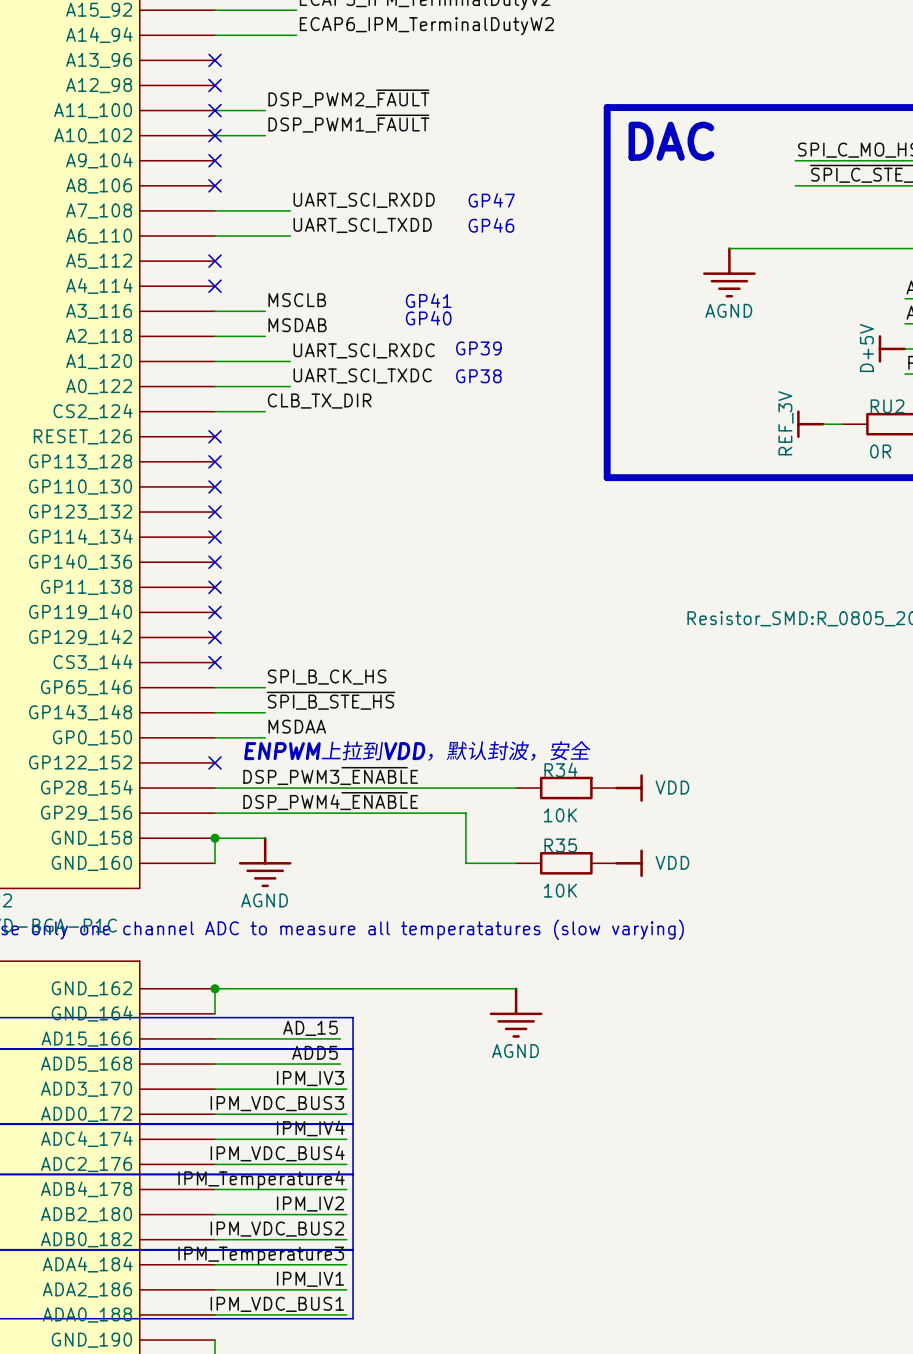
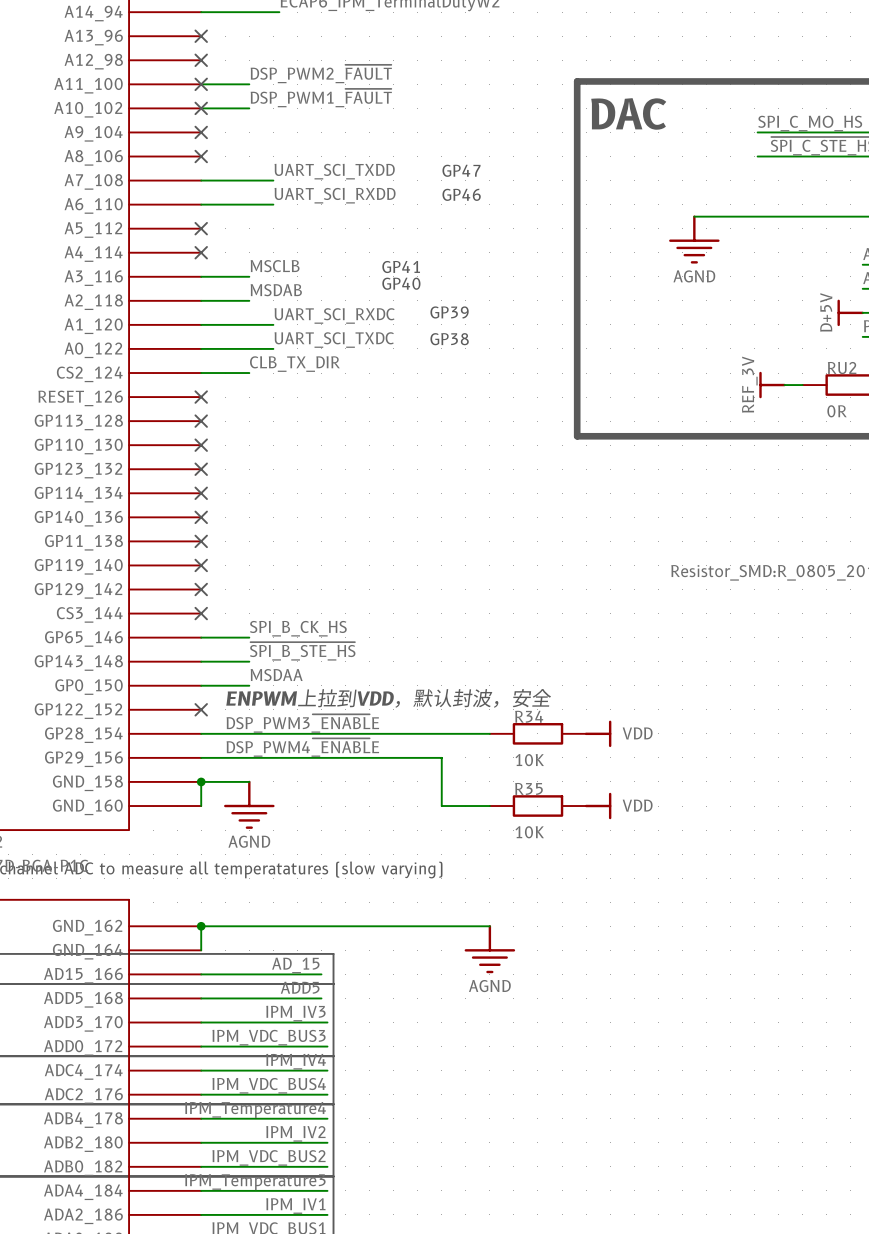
label: UART_SCI_RXDD (364, 200) -> UART_SCI_TXDD (334, 171)
label: UART_SCI_TXDD (362, 225) -> UART_SCI_RXDD (335, 195)

